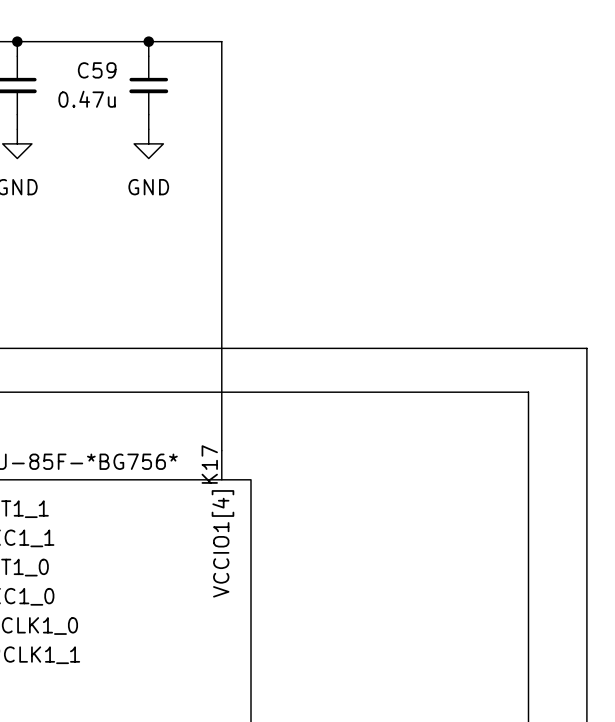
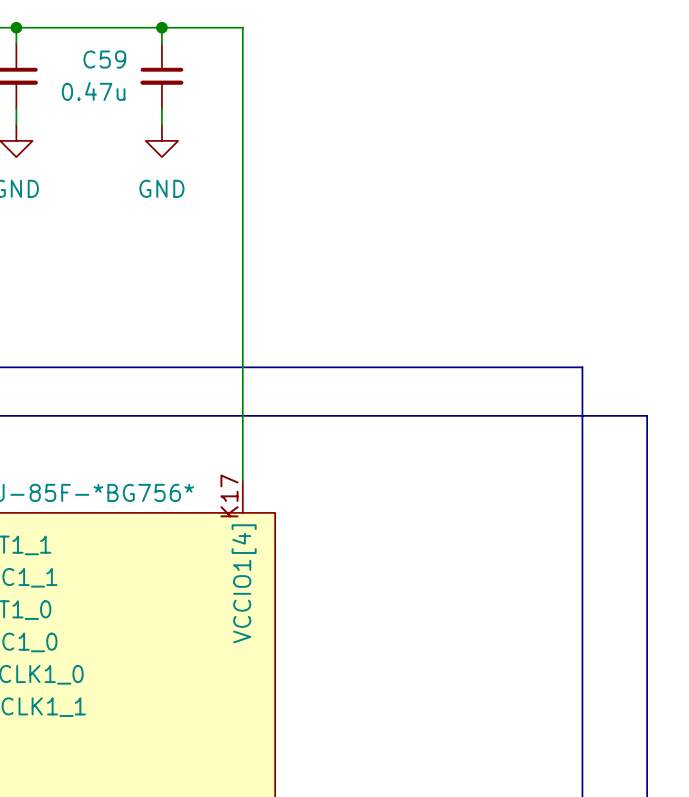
bus: (528, 348) (586, 348) (586, 392) -> (582, 367) (582, 415) (647, 415)

